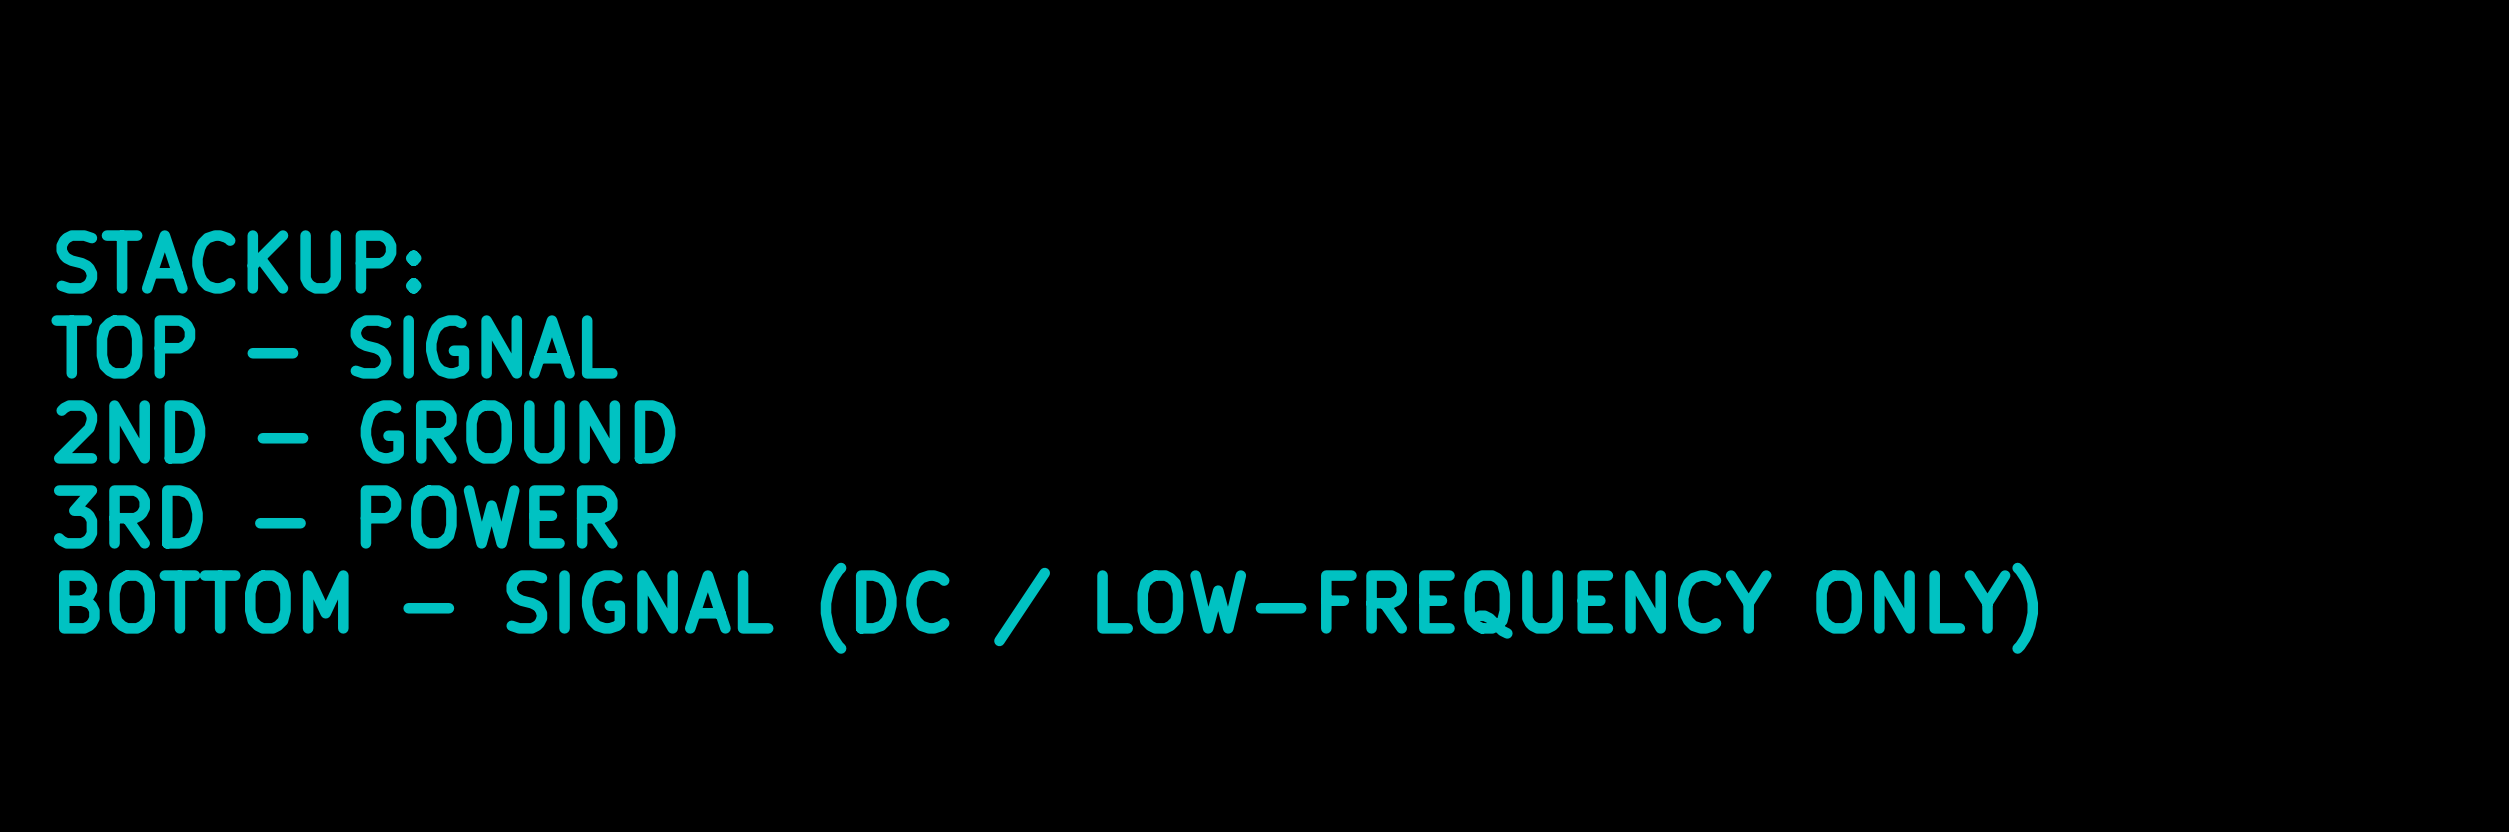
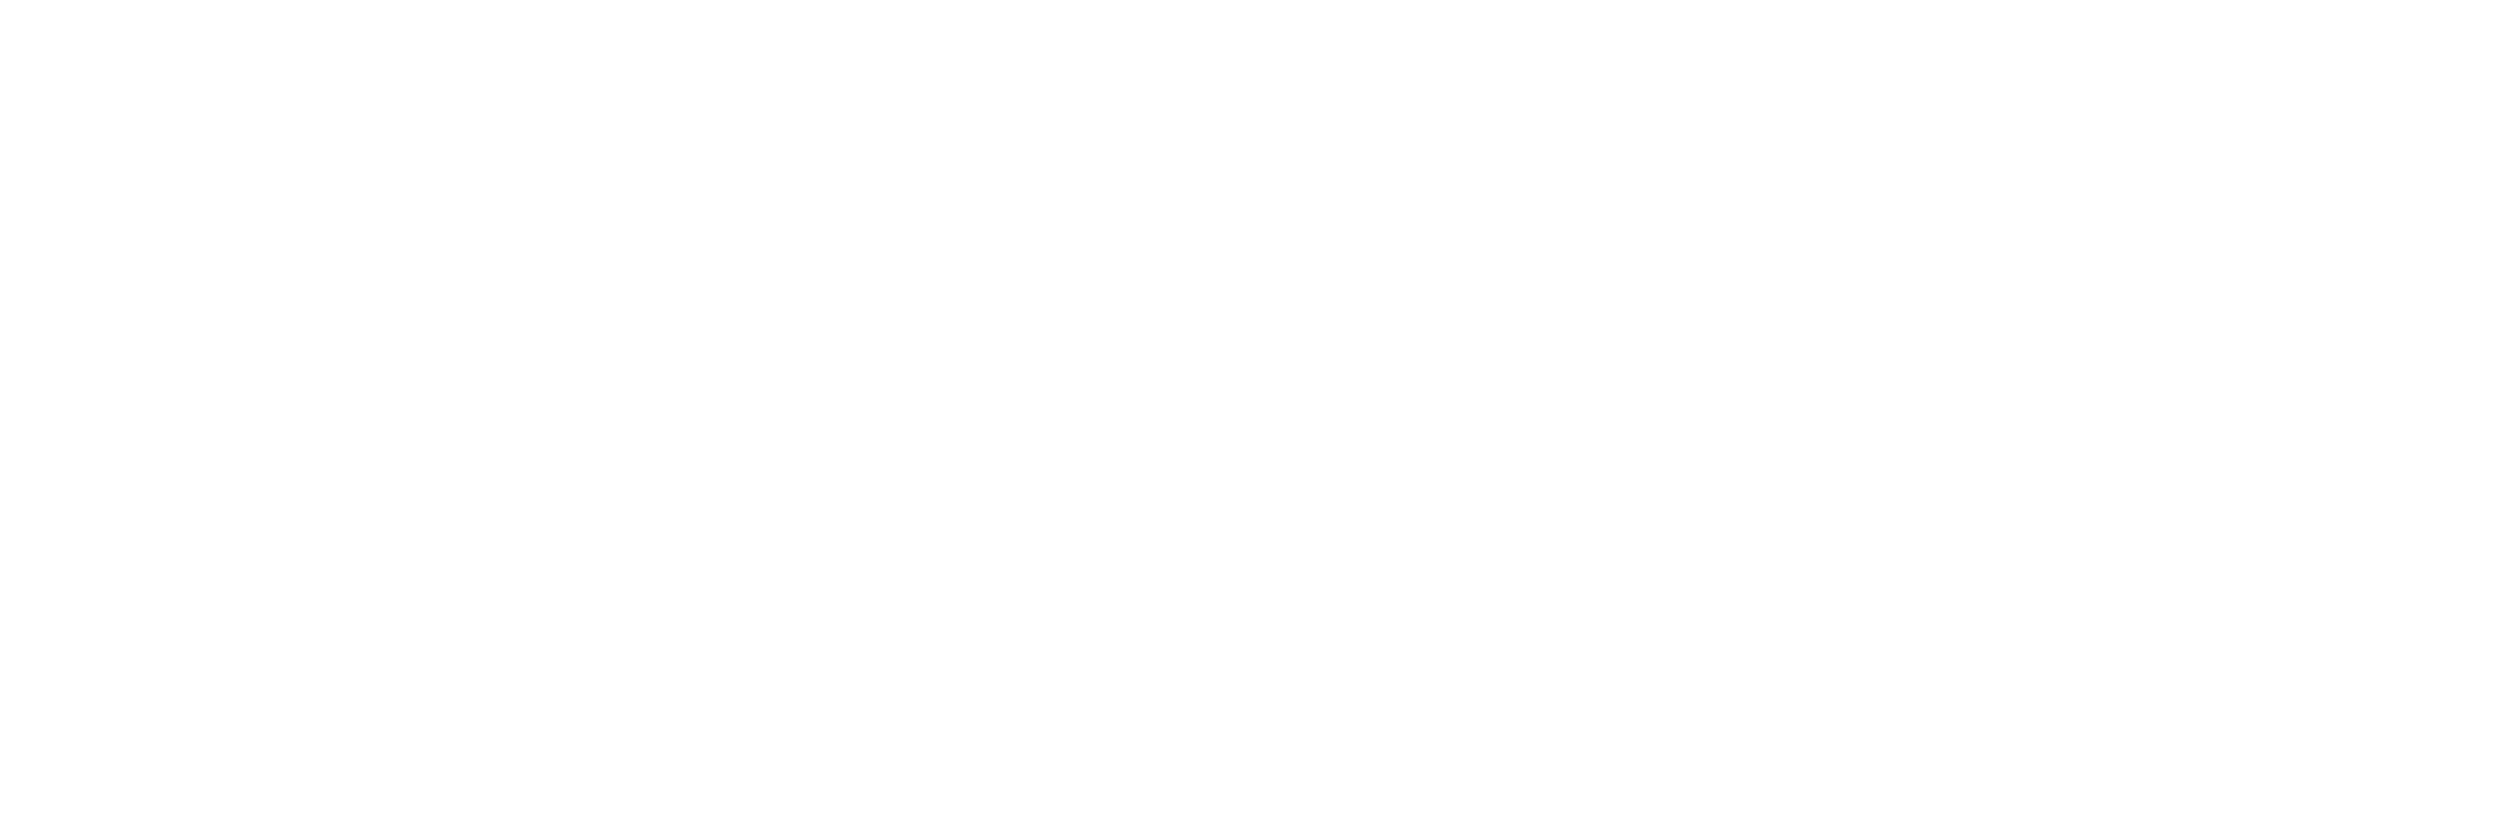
text: STACKUP: (238, 261) -> none
text: TOP - SIGNAL (334, 346) -> none
text: 2ND - GROUND (364, 431) -> none
text: 3RD - POWER (335, 516) -> none
text: BOTTOM - SIGNAL (DC / LOW-FREQUENCY ONLY) (1048, 608) -> none

